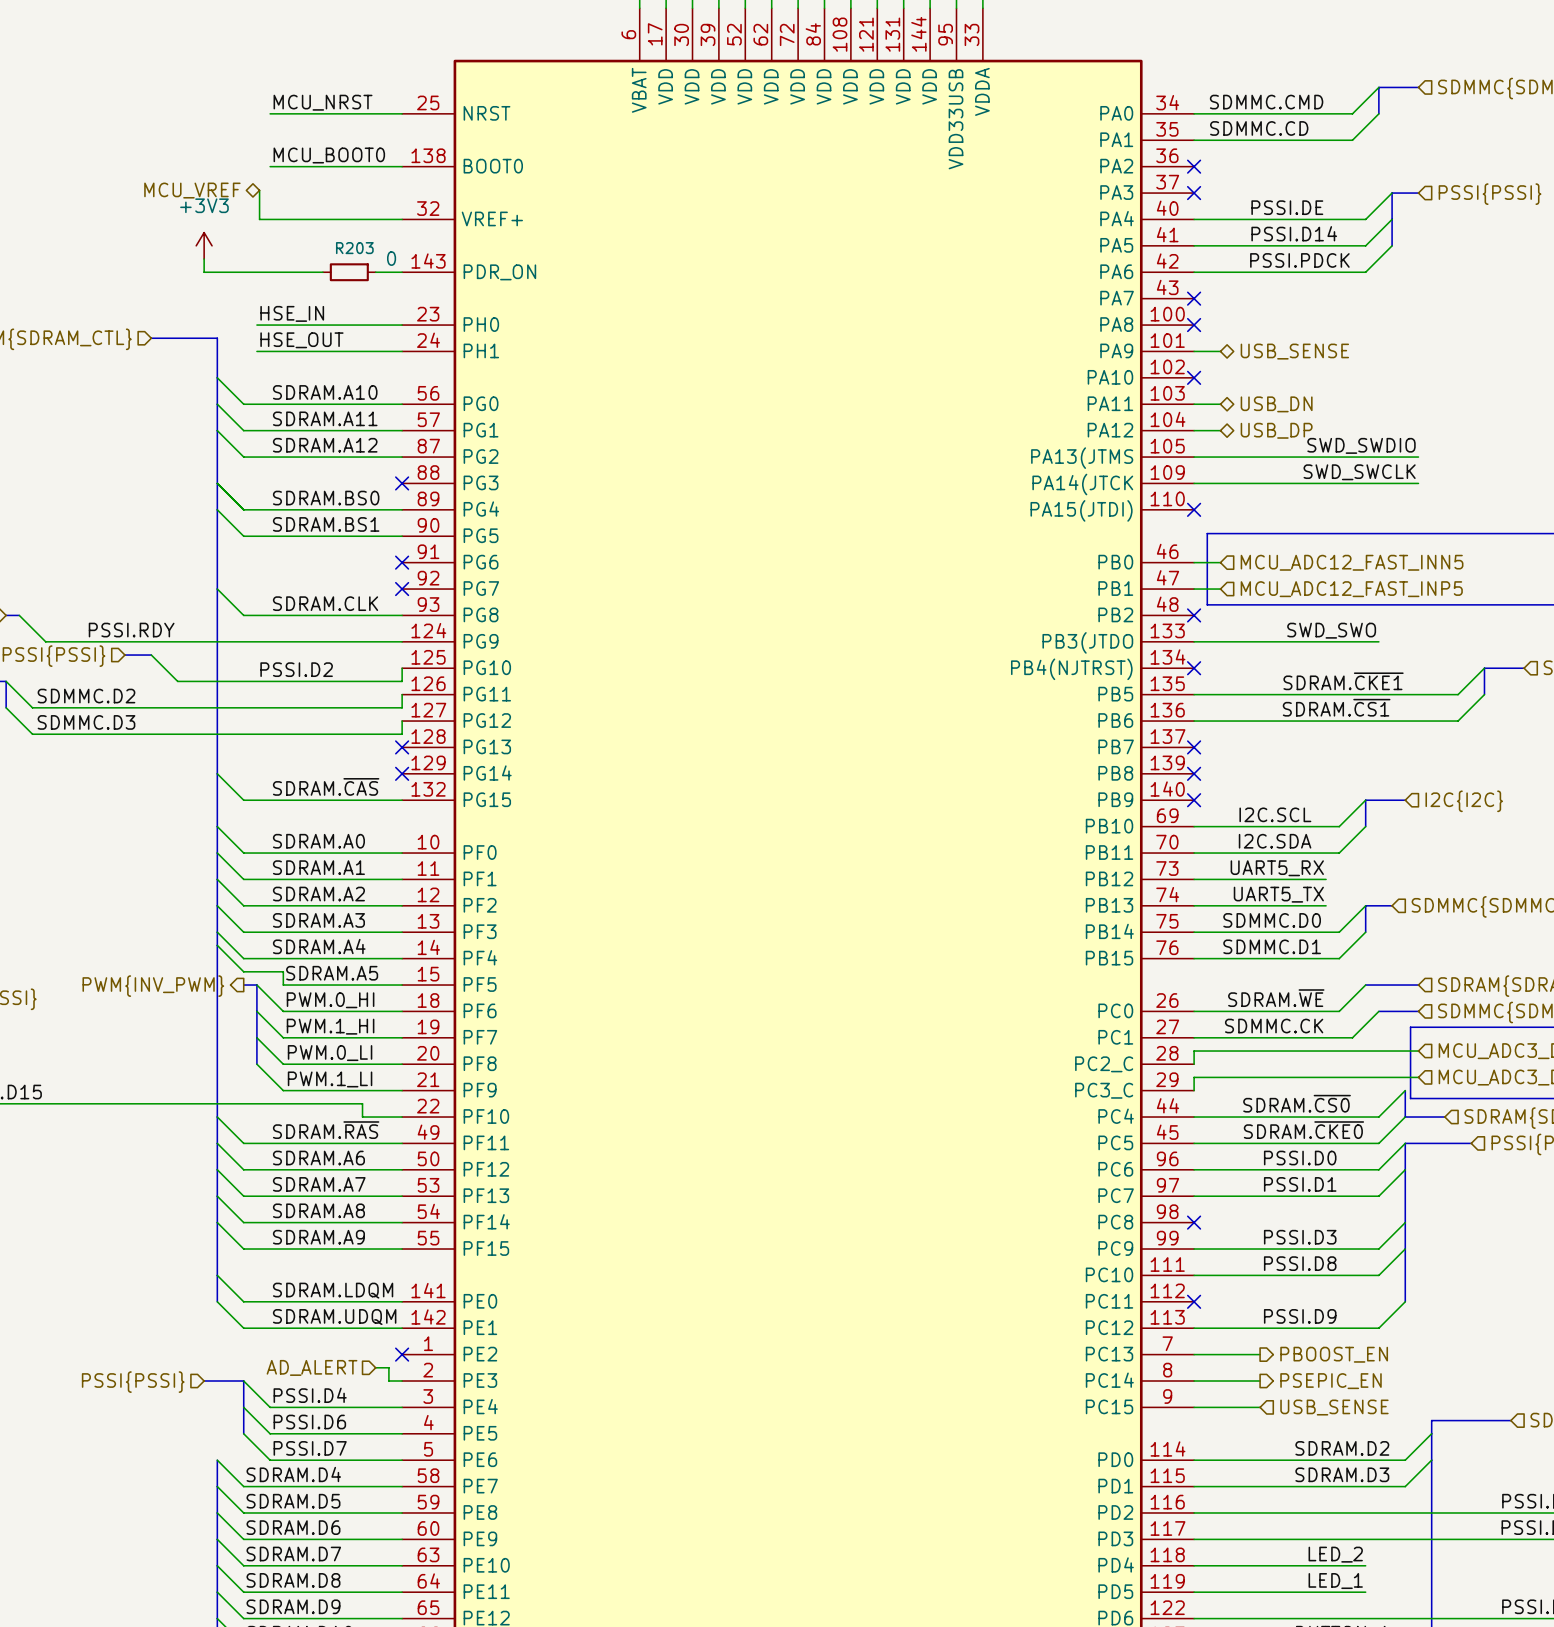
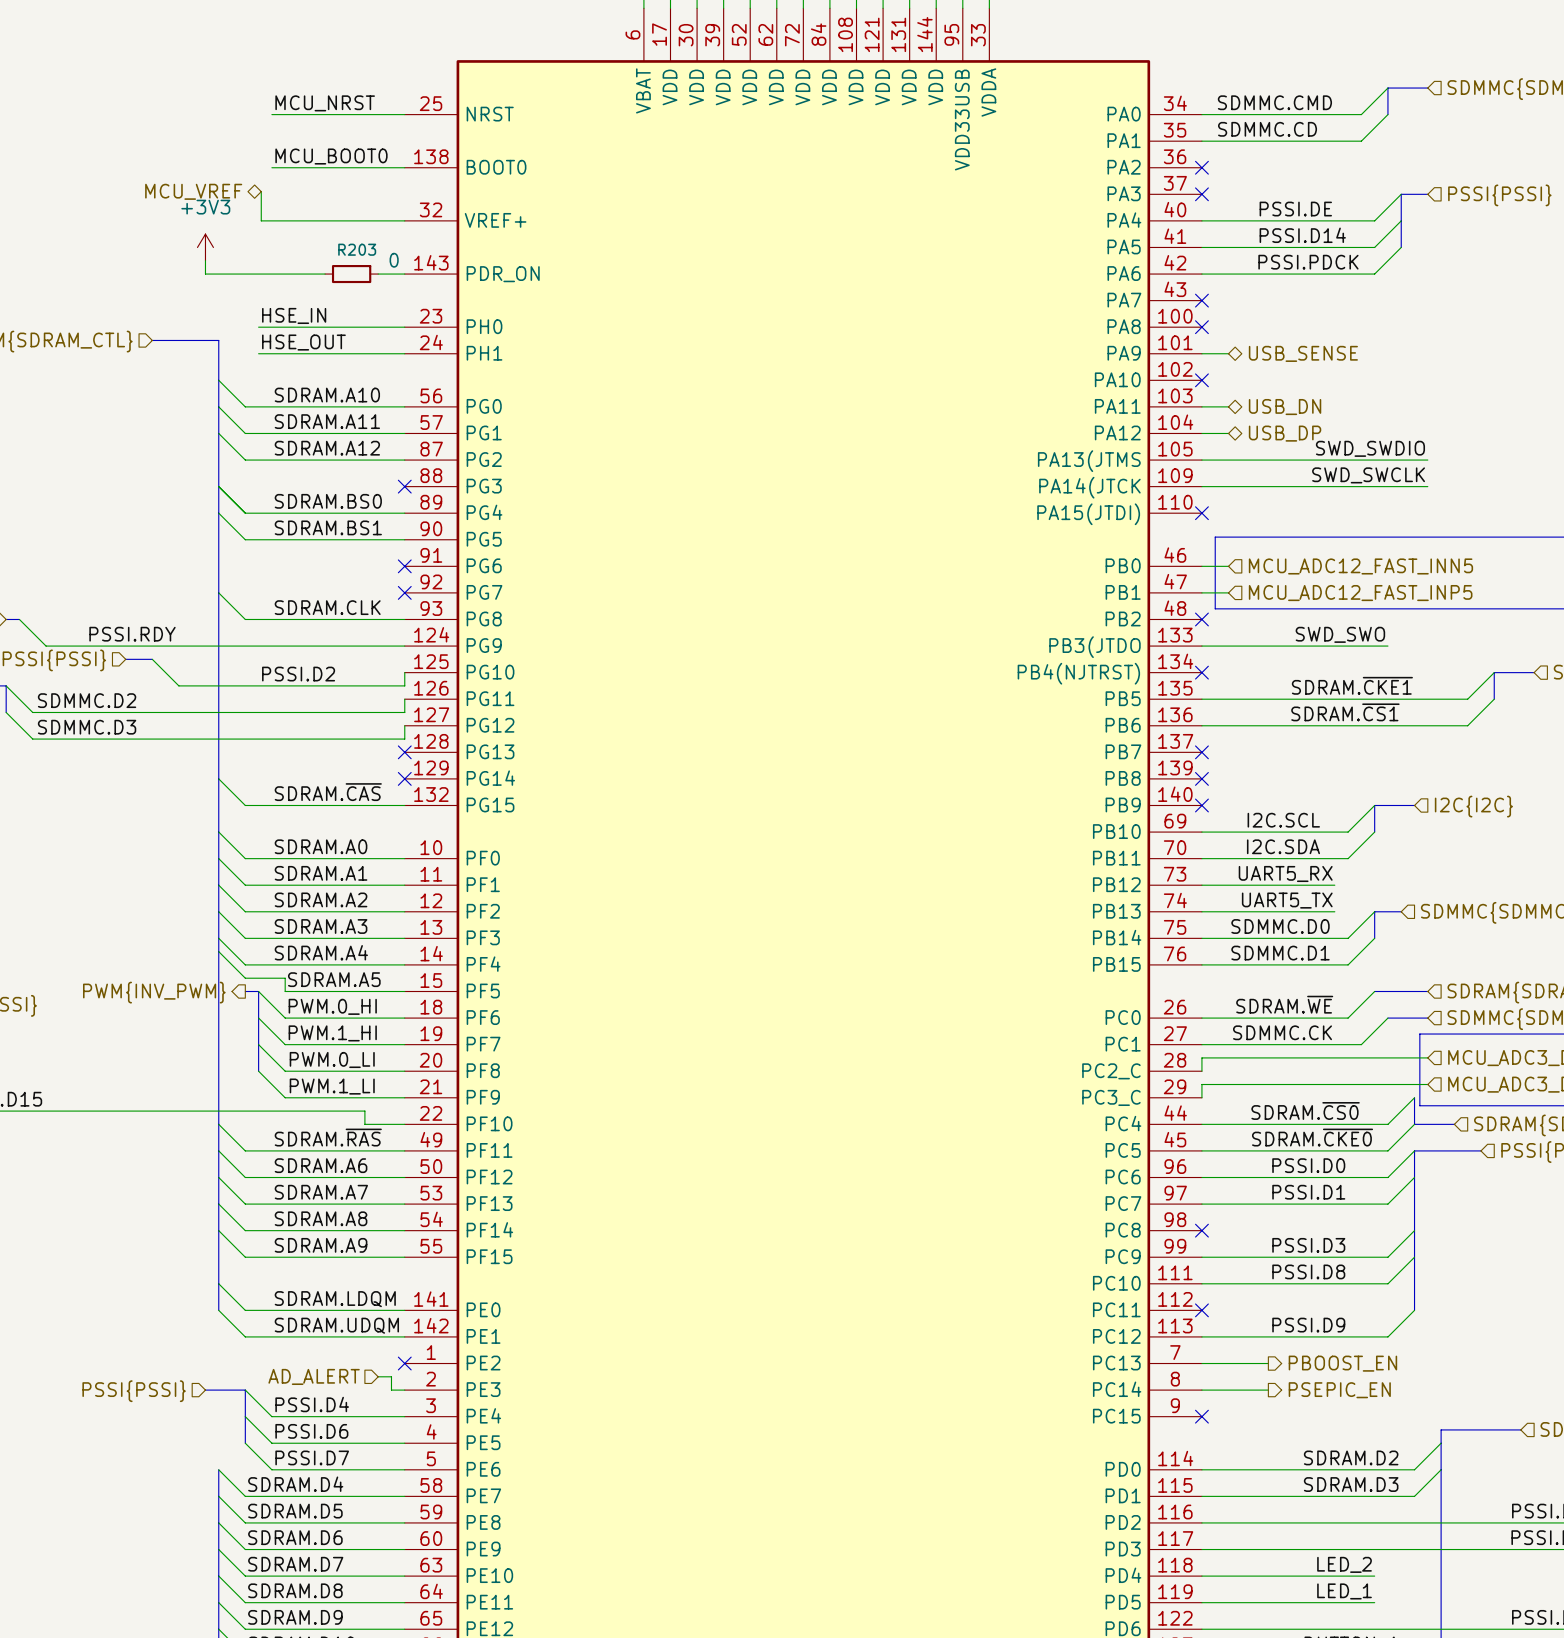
wire: (1194, 1407) (1260, 1407) -> none
no-connect mark: none -> (1201, 1416)
hierarchical label: USB_SENSE (1334, 1407) -> none

